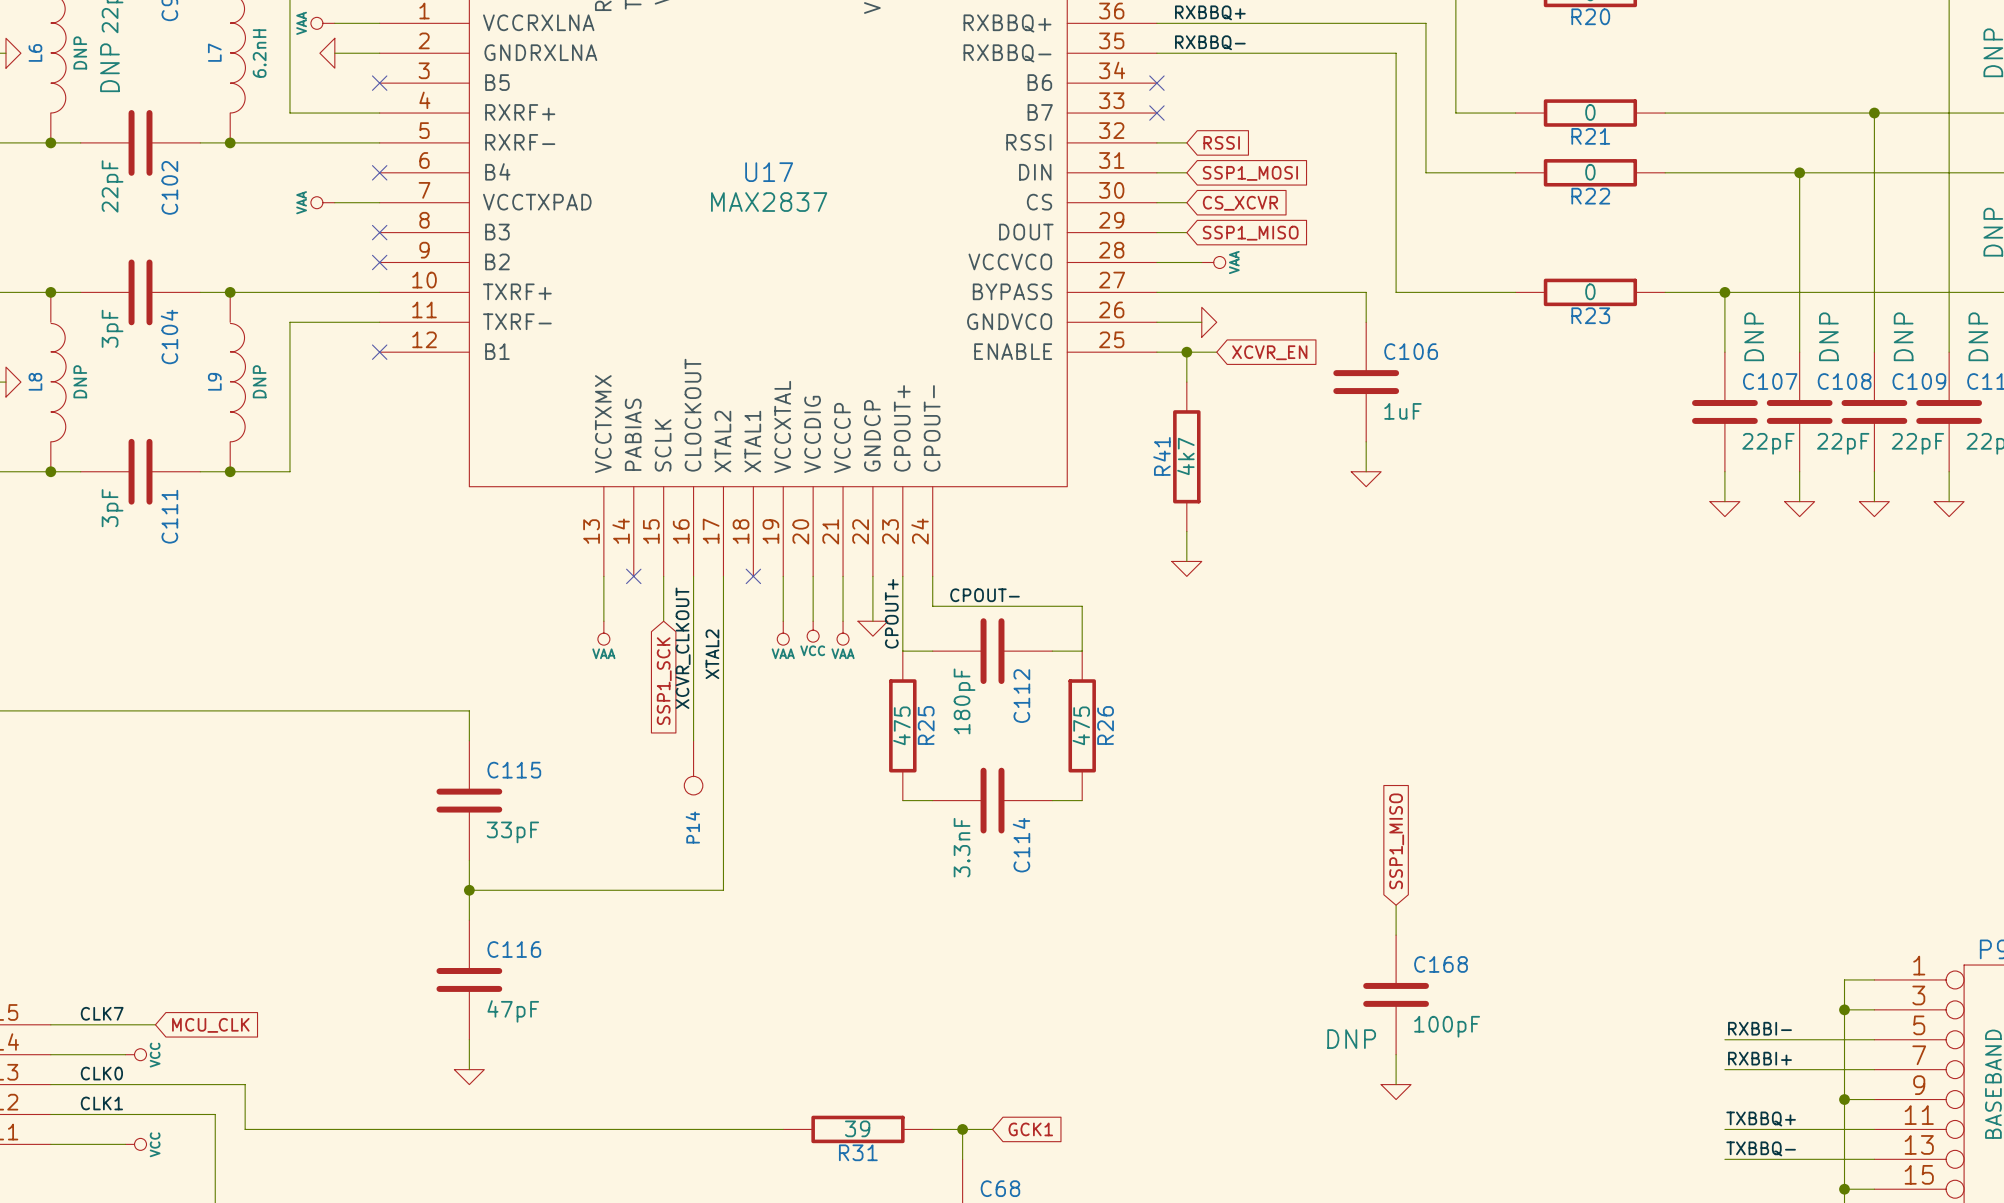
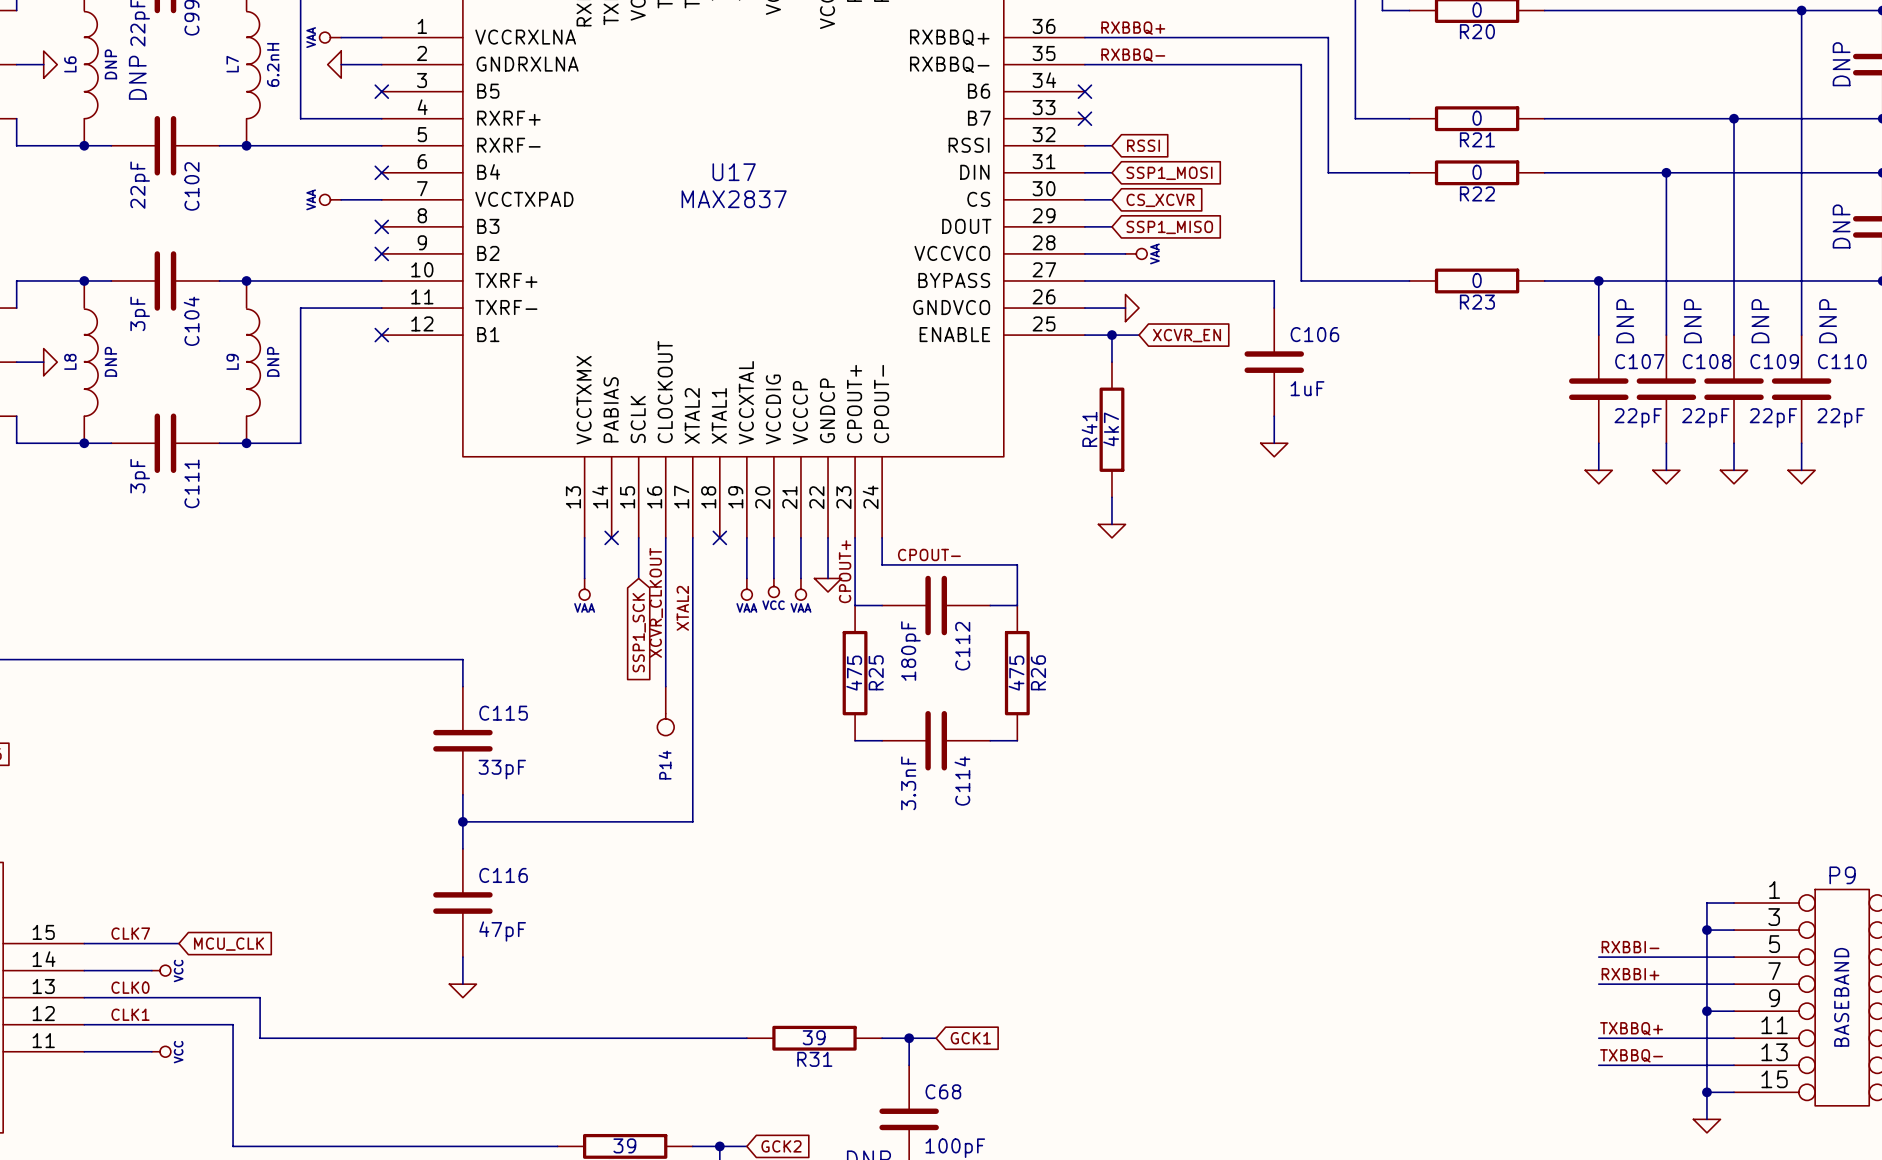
global label: SSP1_MISO (1396, 841) -> none
wire: (1396, 905) (1396, 935) -> none
C168: 100pF (1396, 994) -> none
wire: (1396, 1054) (1396, 1084) -> none
power symbol: (1396, 1092) -> none

